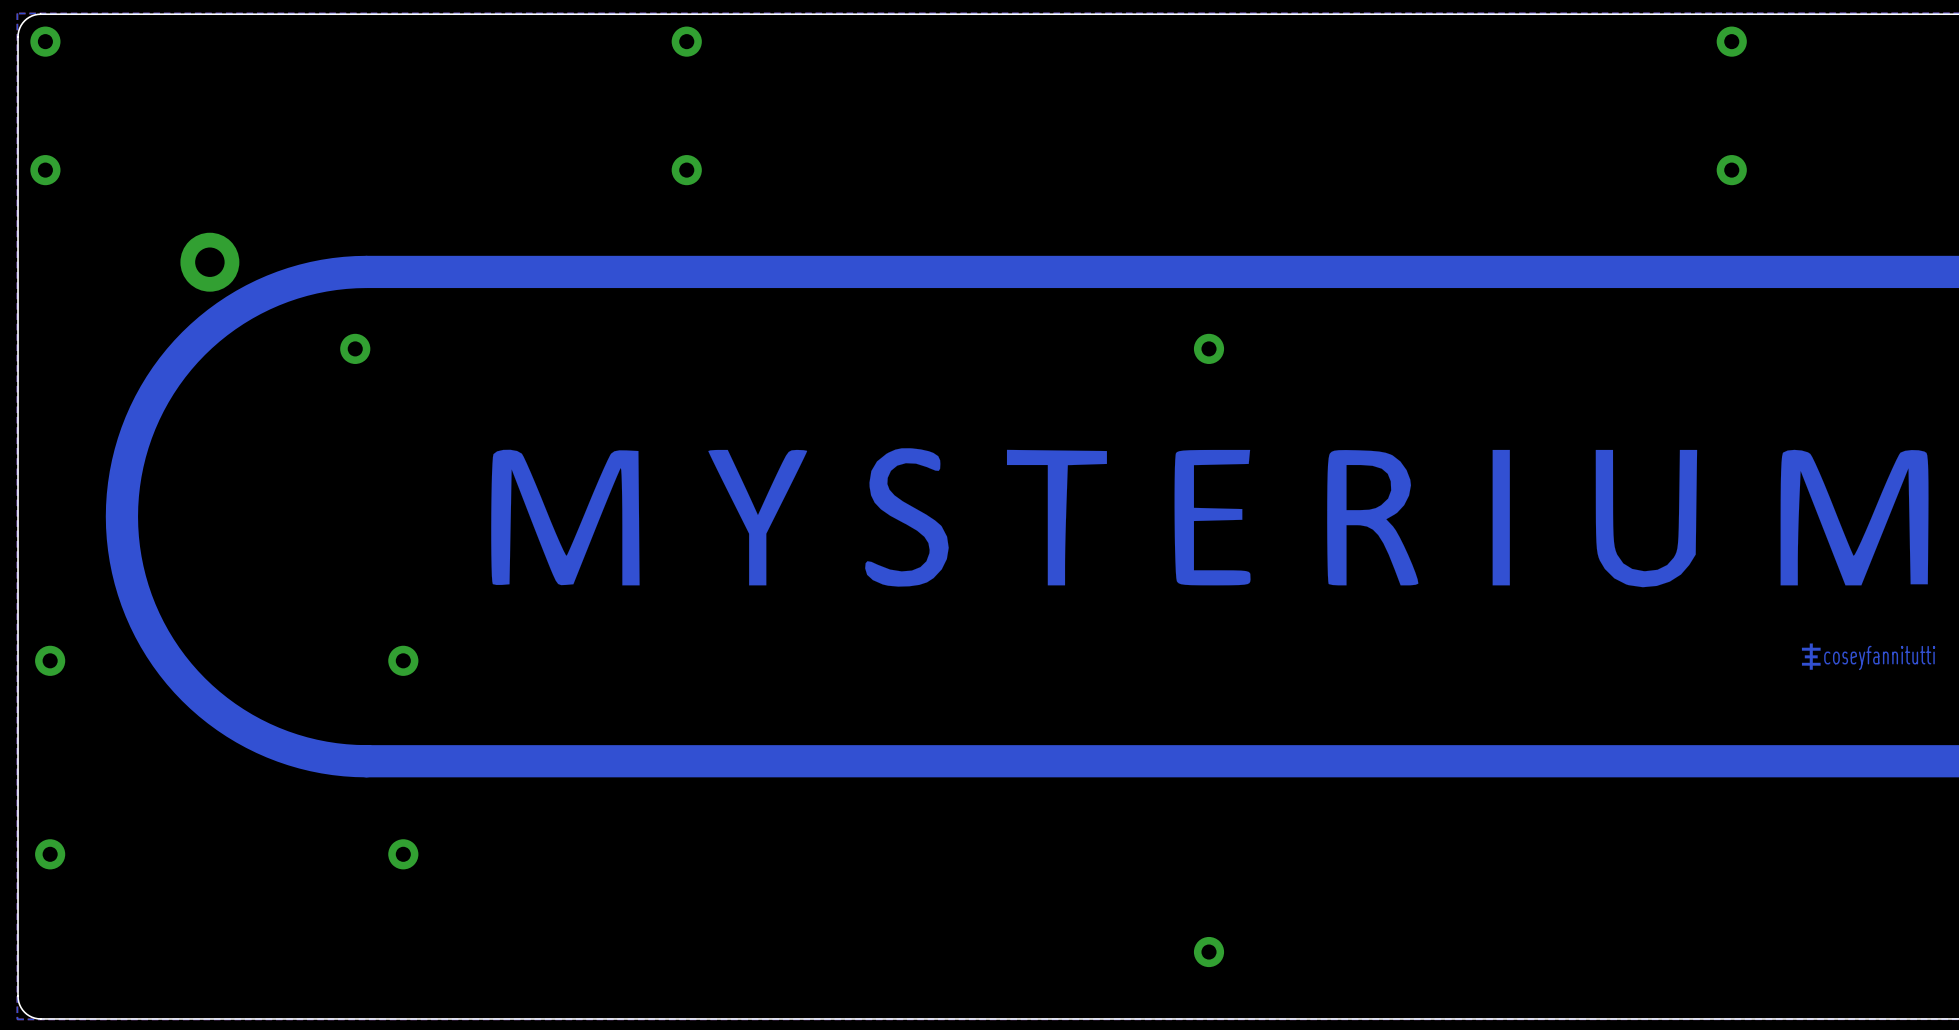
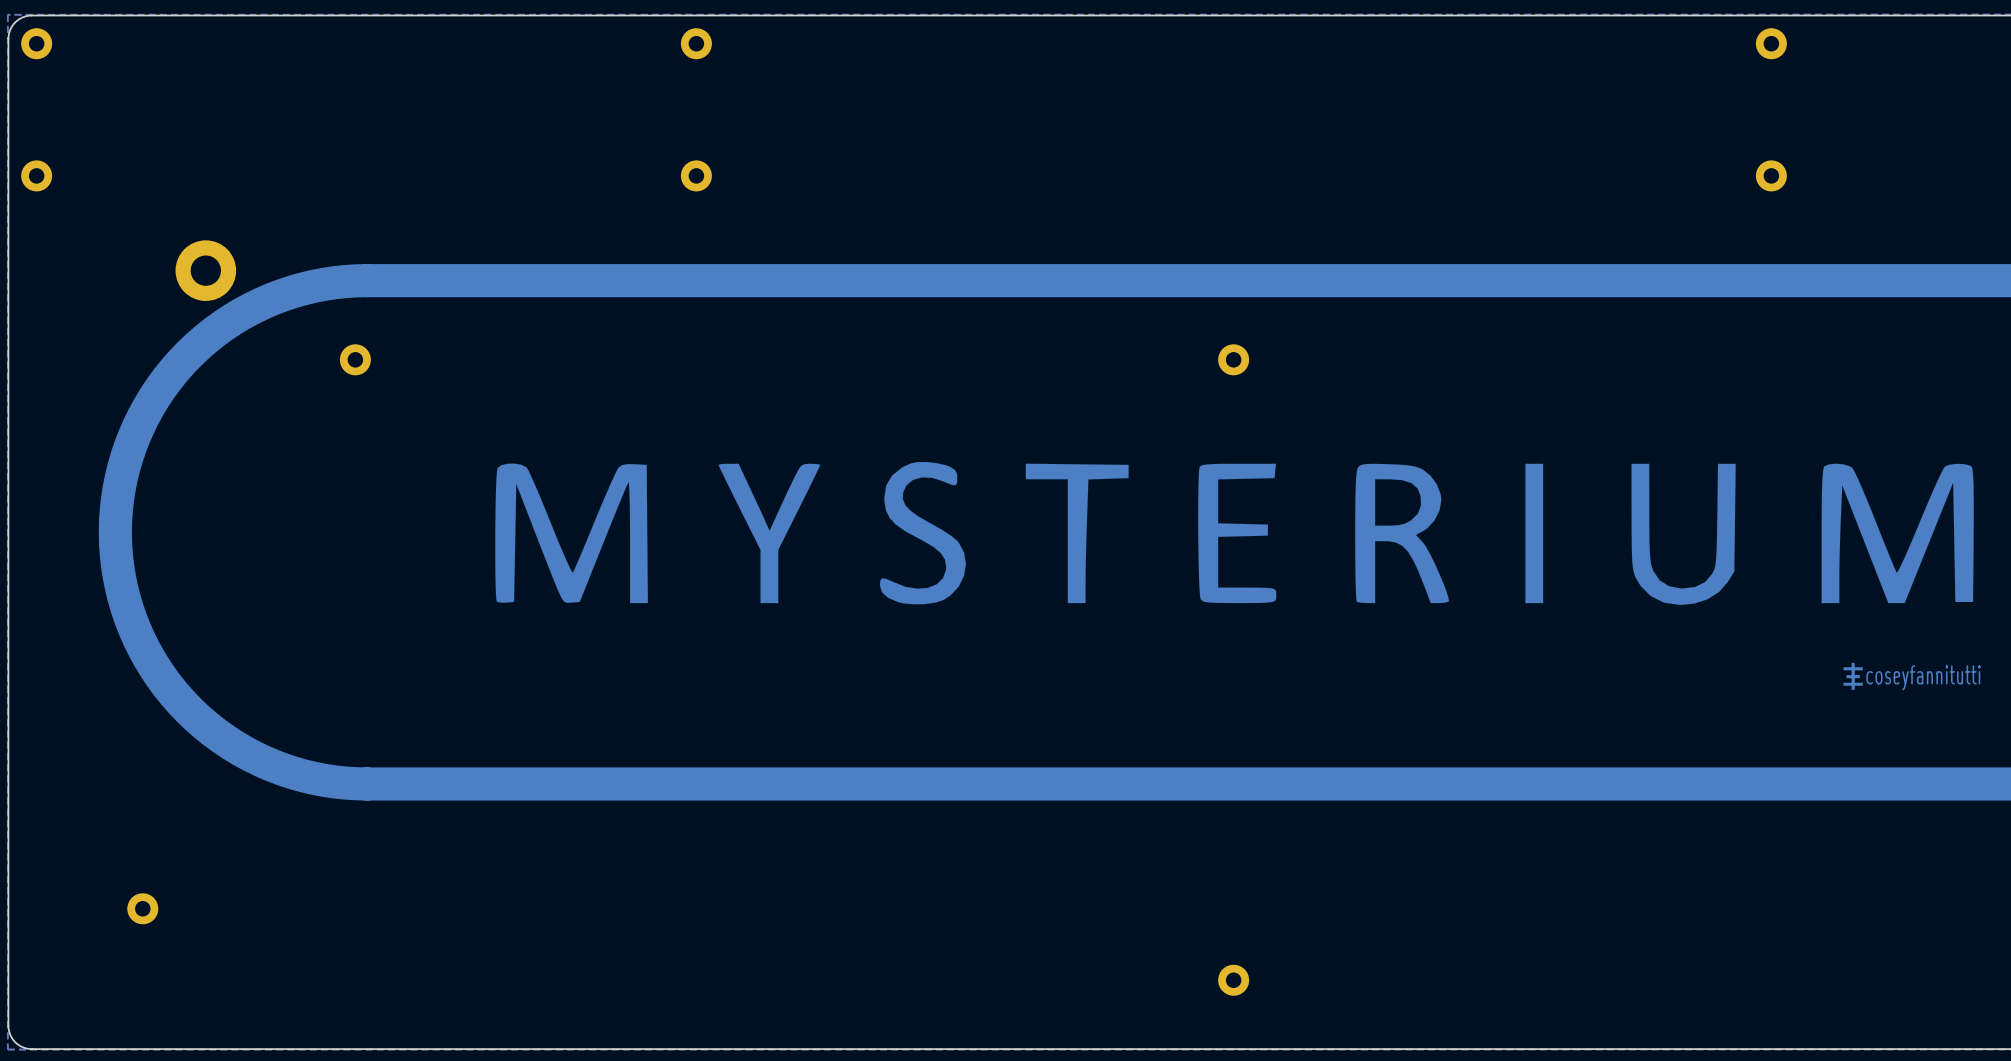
part: (50, 660) -> none
part: (403, 660) -> none
part position: (50, 854) -> (142, 908)
part: (403, 854) -> none

